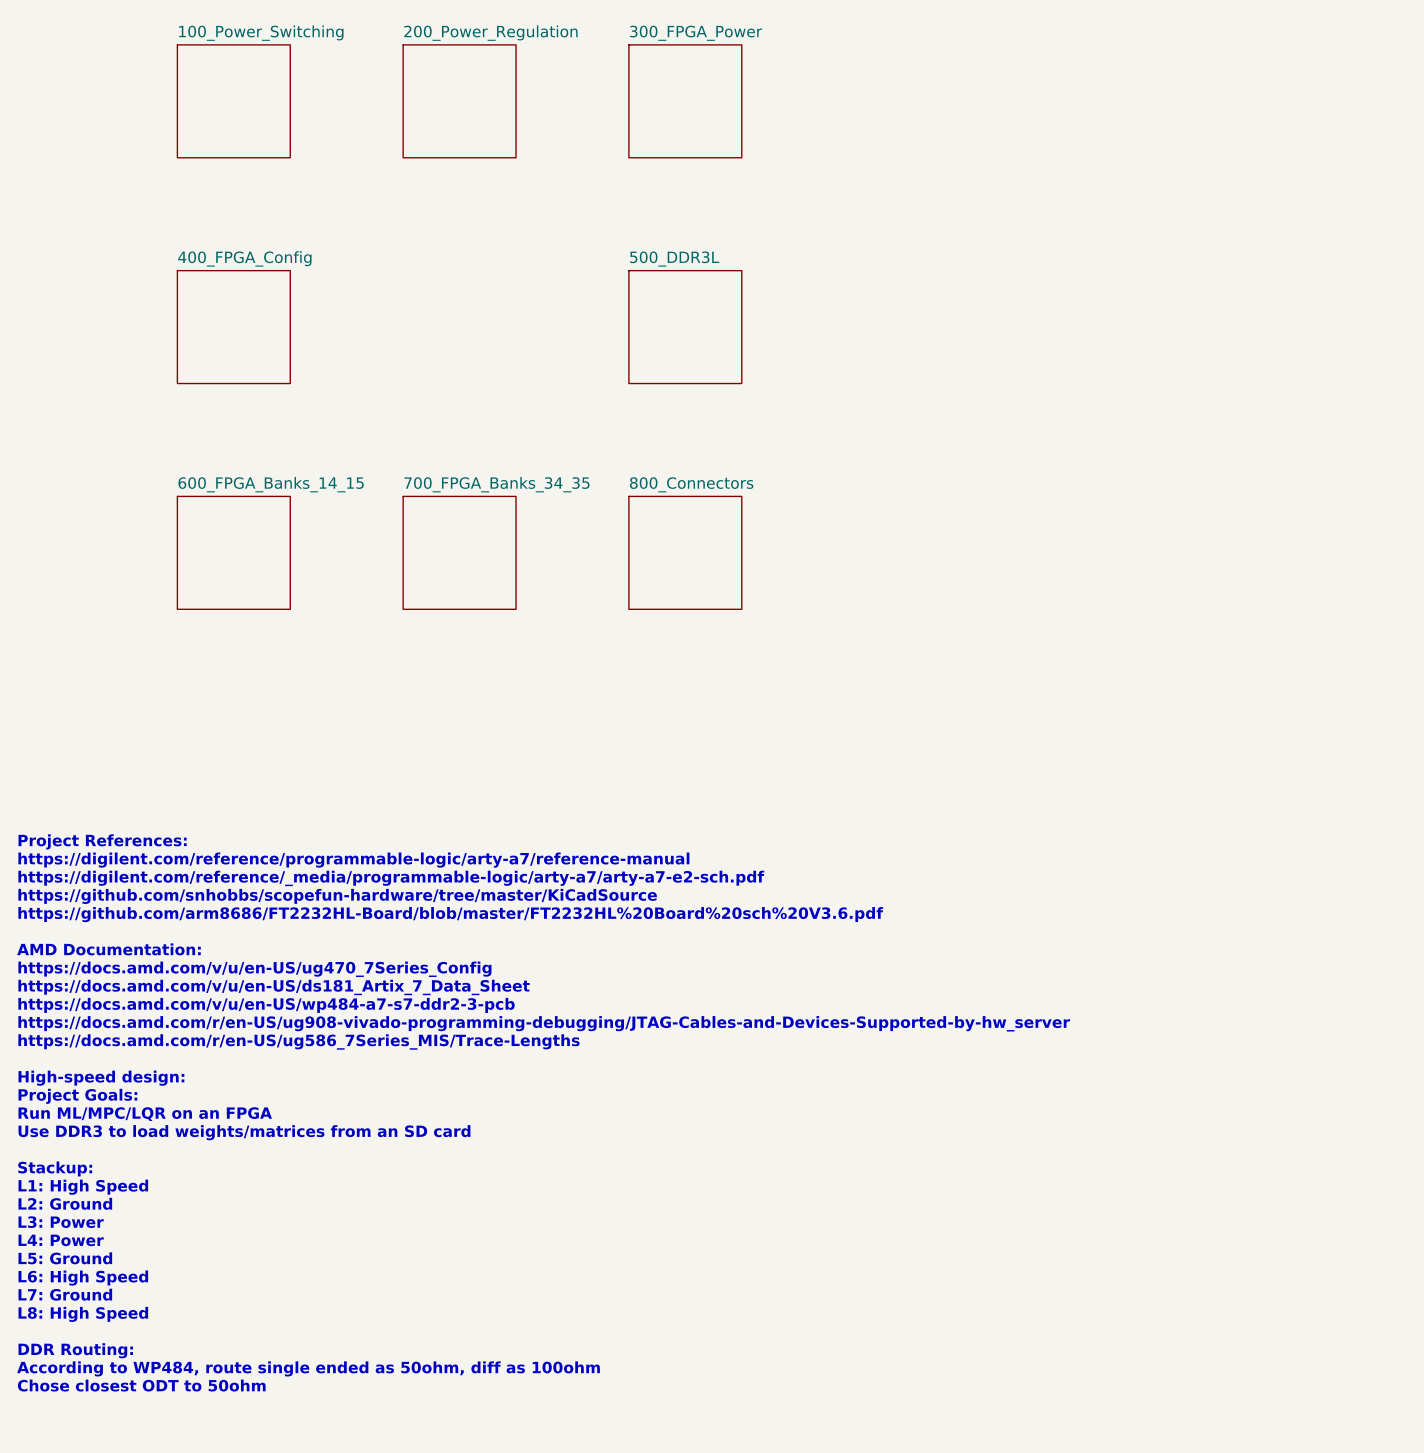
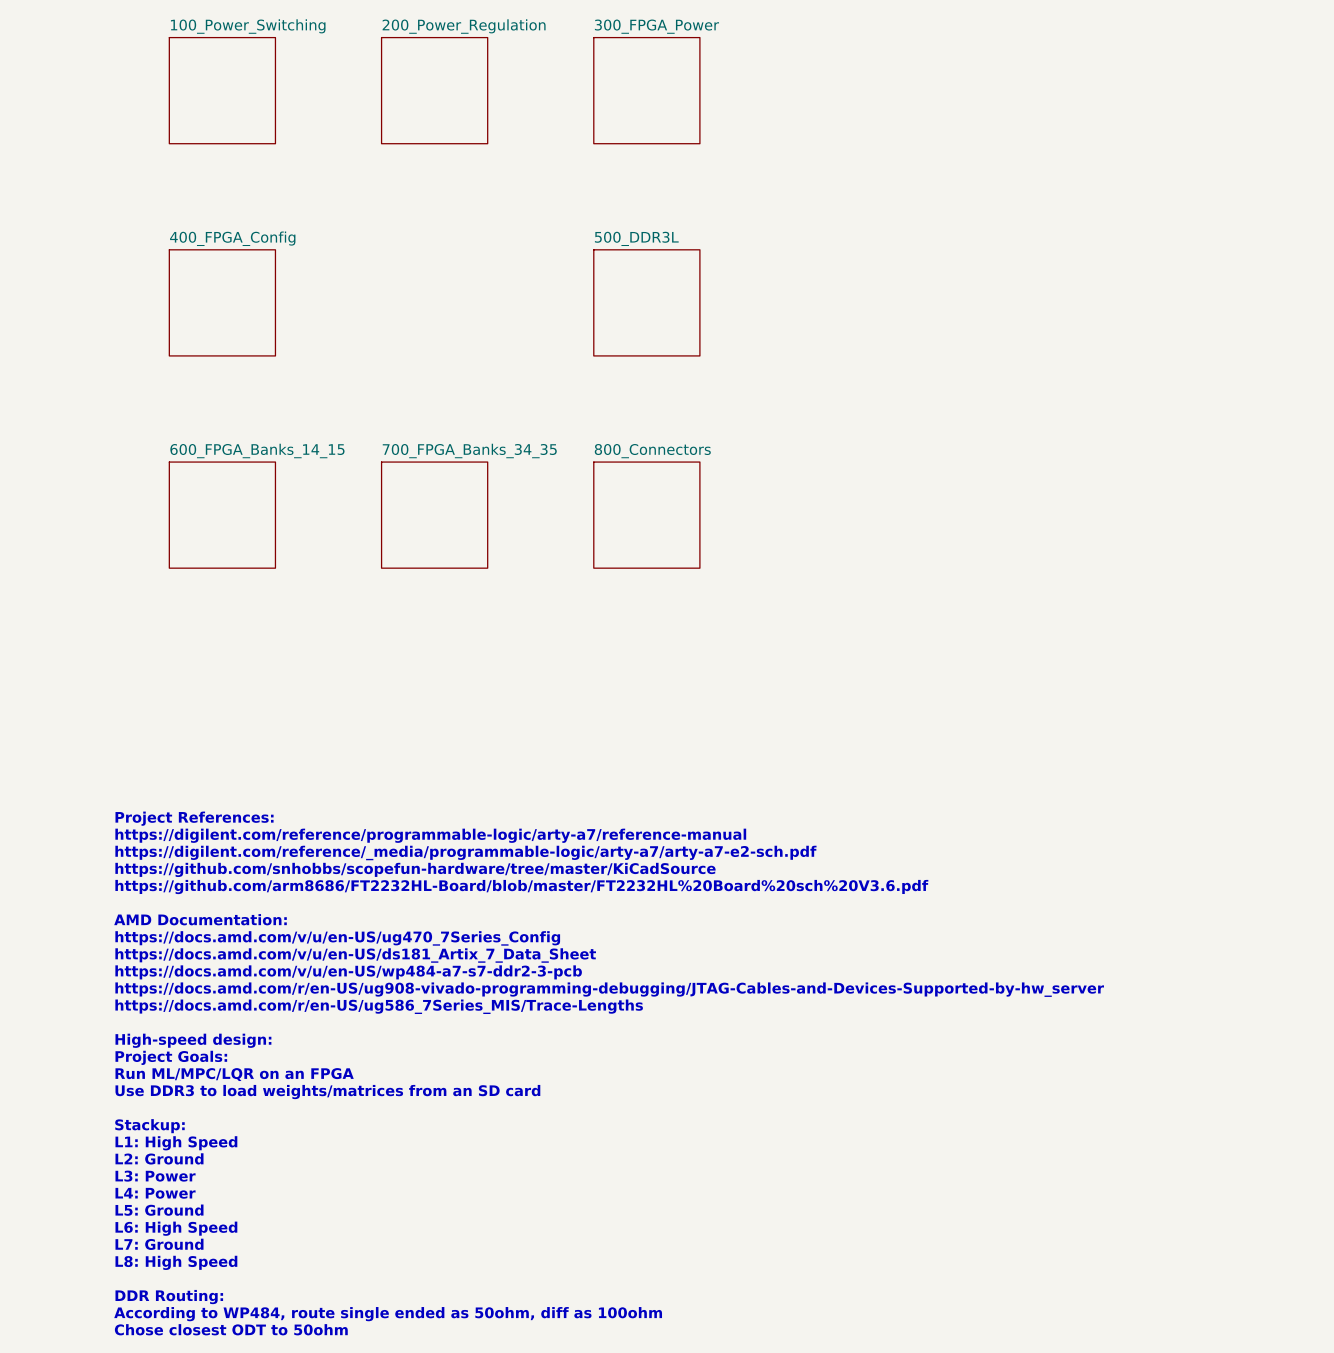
text position: Project References: (102, 841) -> Project References: (194, 818)
text position: https://digilent.com/reference/programmable-logic/arty-a7/reference-manual (353, 860) -> https://digilent.com/reference/programmable-logic/arty-a7/reference-manual (430, 835)
text position: https://digilent.com/reference/_media/programmable-logic/arty-a7/arty-a7-e2-sch.pdf (391, 878) -> https://digilent.com/reference/_media/programmable-logic/arty-a7/arty-a7-e2-sch.pdf (465, 852)
text position: https://github.com/snhobbs/scopefun-hardware/tree/master/KiCadSource (337, 896) -> https://github.com/snhobbs/scopefun-hardware/tree/master/KiCadSource (415, 869)
text position: https://github.com/arm8686/FT2232HL-Board/blob/master/FT2232HL%20Board%20sch%20V3.6.pdf (450, 914) -> https://github.com/arm8686/FT2232HL-Board/blob/master/FT2232HL%20Board%20sch%20V3.6.pdf (521, 887)
text position: AMD Documentation: (108, 949) -> AMD Documentation: (200, 919)
text position: https://docs.amd.com/v/u/en-US/ug470_7Series_Config (254, 969) -> https://docs.amd.com/v/u/en-US/ug470_7Series_Config (337, 938)
text position: https://docs.amd.com/v/u/en-US/ds181_Artix_7_Data_Sheet (274, 987) -> https://docs.amd.com/v/u/en-US/ds181_Artix_7_Data_Sheet (355, 955)
text position: https://docs.amd.com/v/u/en-US/wp484-a7-s7-ddr2-3-pcb (266, 1005) -> https://docs.amd.com/v/u/en-US/wp484-a7-s7-ddr2-3-pcb (348, 972)
text position: https://docs.amd.com/r/en-US/ug908-vivado-programming-debugging/JTAG-Cables-and-Devices-Supported-by-hw_server (544, 1023) -> https://docs.amd.com/r/en-US/ug908-vivado-programming-debugging/JTAG-Cables-and-Devices-Supported-by-hw_server (609, 989)
text position: https://docs.amd.com/r/en-US/ug586_7Series_MIS/Trace-Lengths (298, 1041) -> https://docs.amd.com/r/en-US/ug586_7Series_MIS/Trace-Lengths (379, 1006)
text position: High-speed design: (101, 1078) -> High-speed design: (193, 1040)
text position: Project Goals: (77, 1096) -> Project Goals: (171, 1057)
text position: Run ML/MPC/LQR on an FPGA (145, 1114) -> Run ML/MPC/LQR on an FPGA (234, 1074)
text position: Use DDR3 to load weights/matrices from an SD card (244, 1132) -> Use DDR3 to load weights/matrices from an SD card (327, 1092)
text position: Stackup: (55, 1168) -> Stackup: (149, 1126)
text position: L1: High Speed (83, 1187) -> L1: High Speed (176, 1143)
text position: L2: Ground (65, 1203) -> L2: Ground (159, 1158)
text position: L3: Power (61, 1222) -> L3: Power (155, 1176)
text position: L4: Power (61, 1240) -> L4: Power (155, 1193)
text position: L5: Ground (65, 1258) -> L5: Ground (159, 1210)
text position: L6: High Speed (83, 1278) -> L6: High Speed (176, 1228)
text position: L7: Ground (65, 1294) -> L7: Ground (159, 1244)
text position: L8: High Speed (83, 1314) -> L8: High Speed (176, 1262)
text position: DDR Routing: (75, 1350) -> DDR Routing: (169, 1297)
text position: According to WP484, route single ended as 50ohm, diff as 100ohm (308, 1368) -> According to WP484, route single ended as 50ohm, diff as 100ohm (388, 1314)
text position: Chose closest ODT to 50ohm (141, 1385) -> Chose closest ODT to 50ohm (231, 1329)

